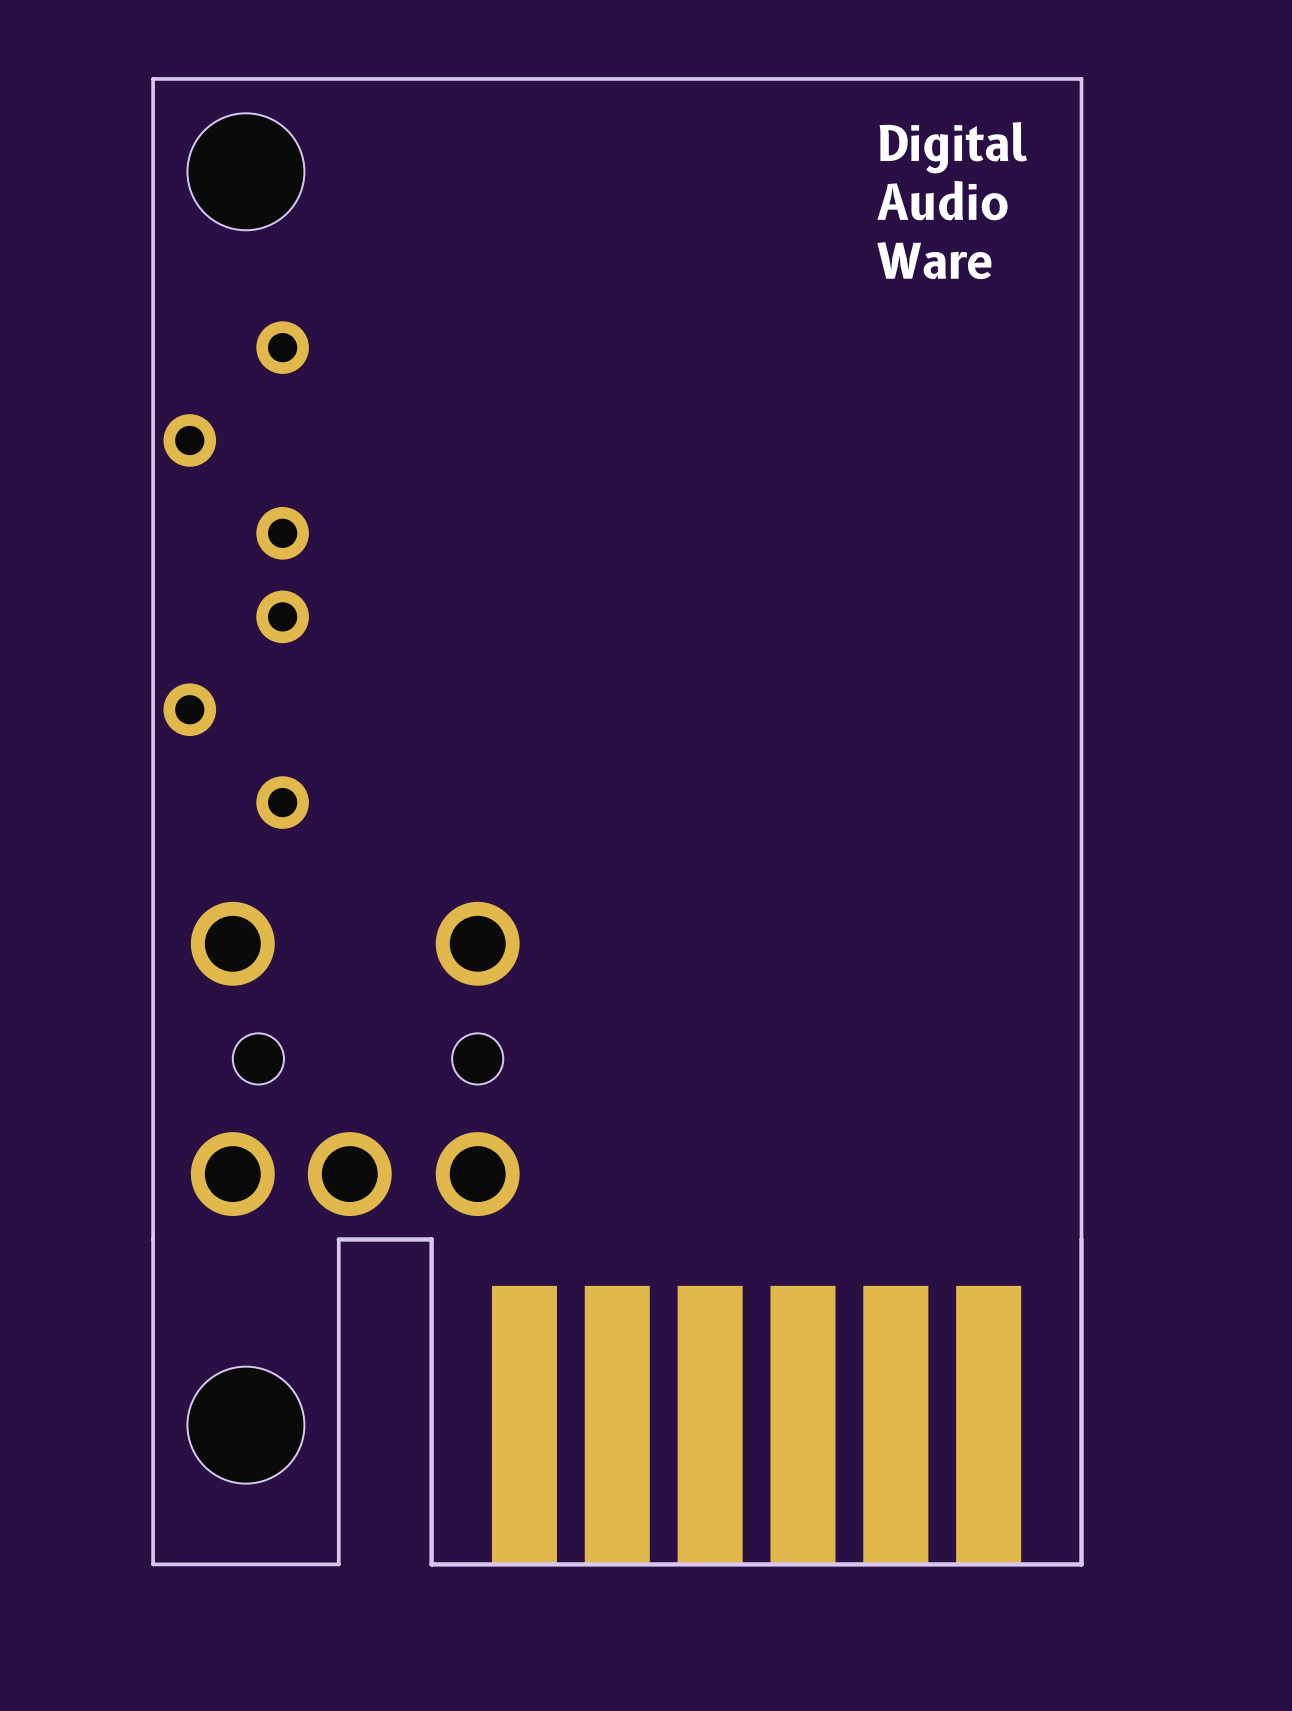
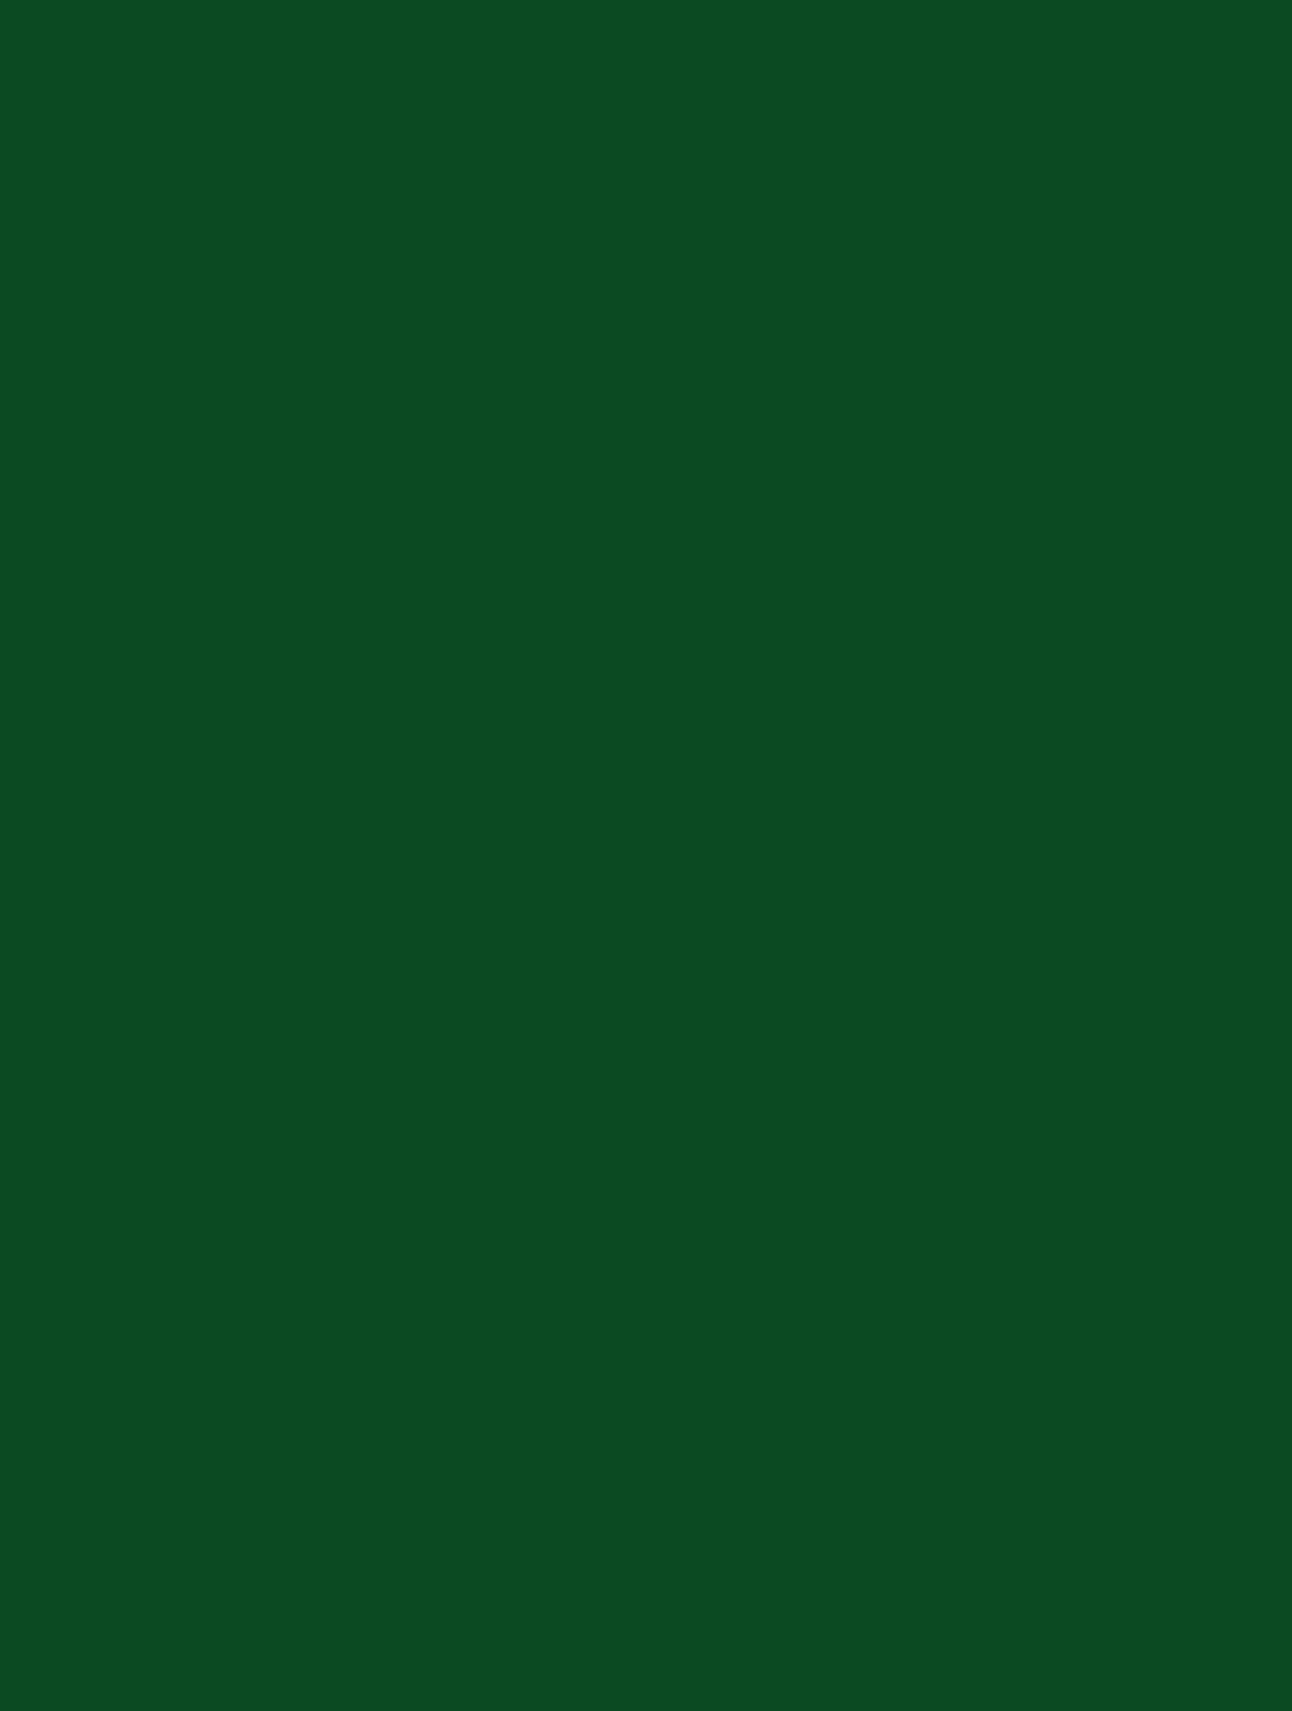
text: Digital (953, 147) -> none
part: (245, 171) -> none
text: Audio (942, 200) -> none
text: Ware (934, 260) -> none
part: (236, 440) -> none
part: (236, 709) -> none
part: (355, 1058) -> none
board edge: (1081, 1239) (1081, 78) (153, 78) (153, 1564) (338, 1564) (338, 1239) -> none
part: (710, 1401) -> none
part: (245, 1425) -> none

